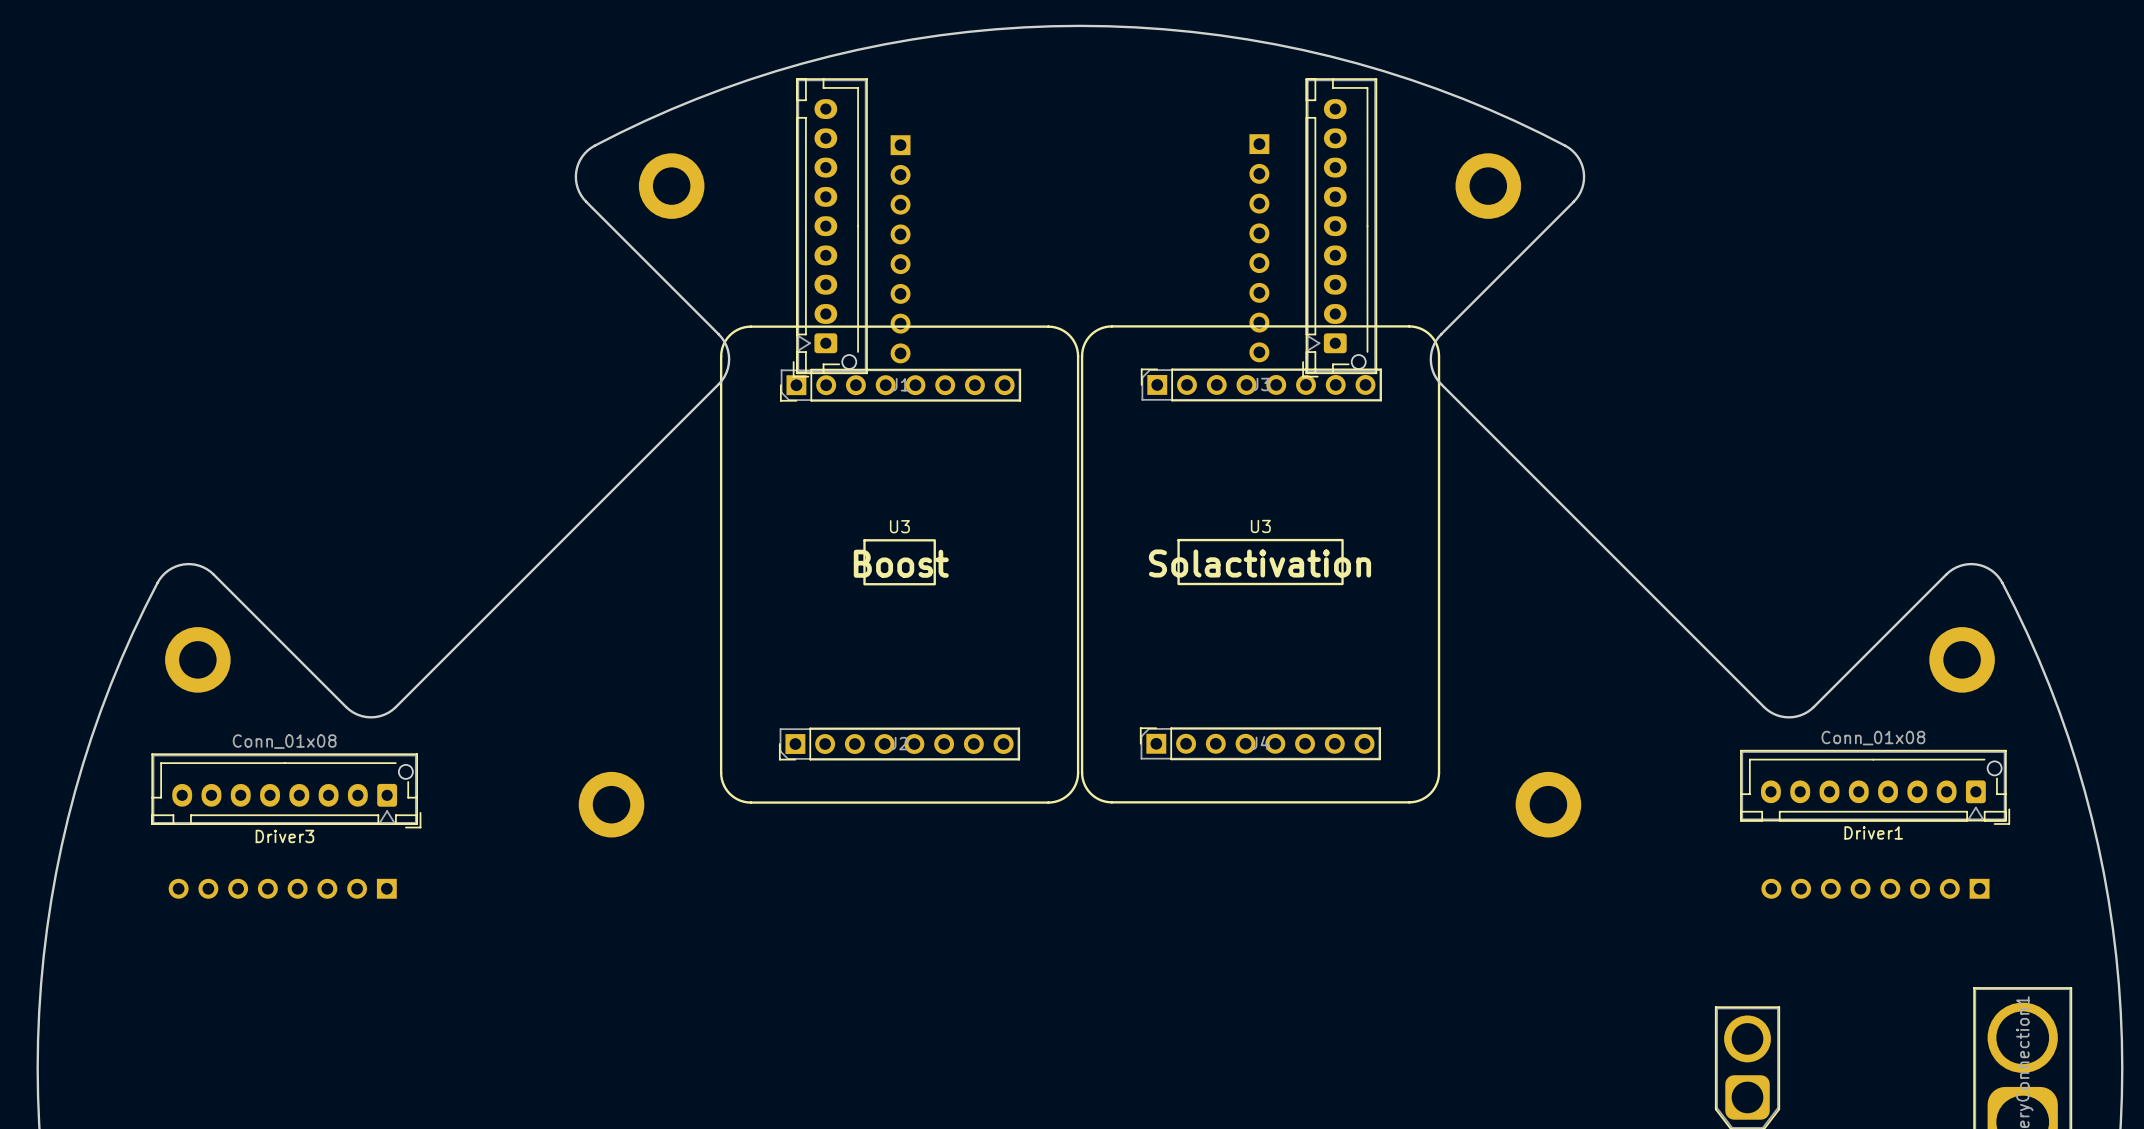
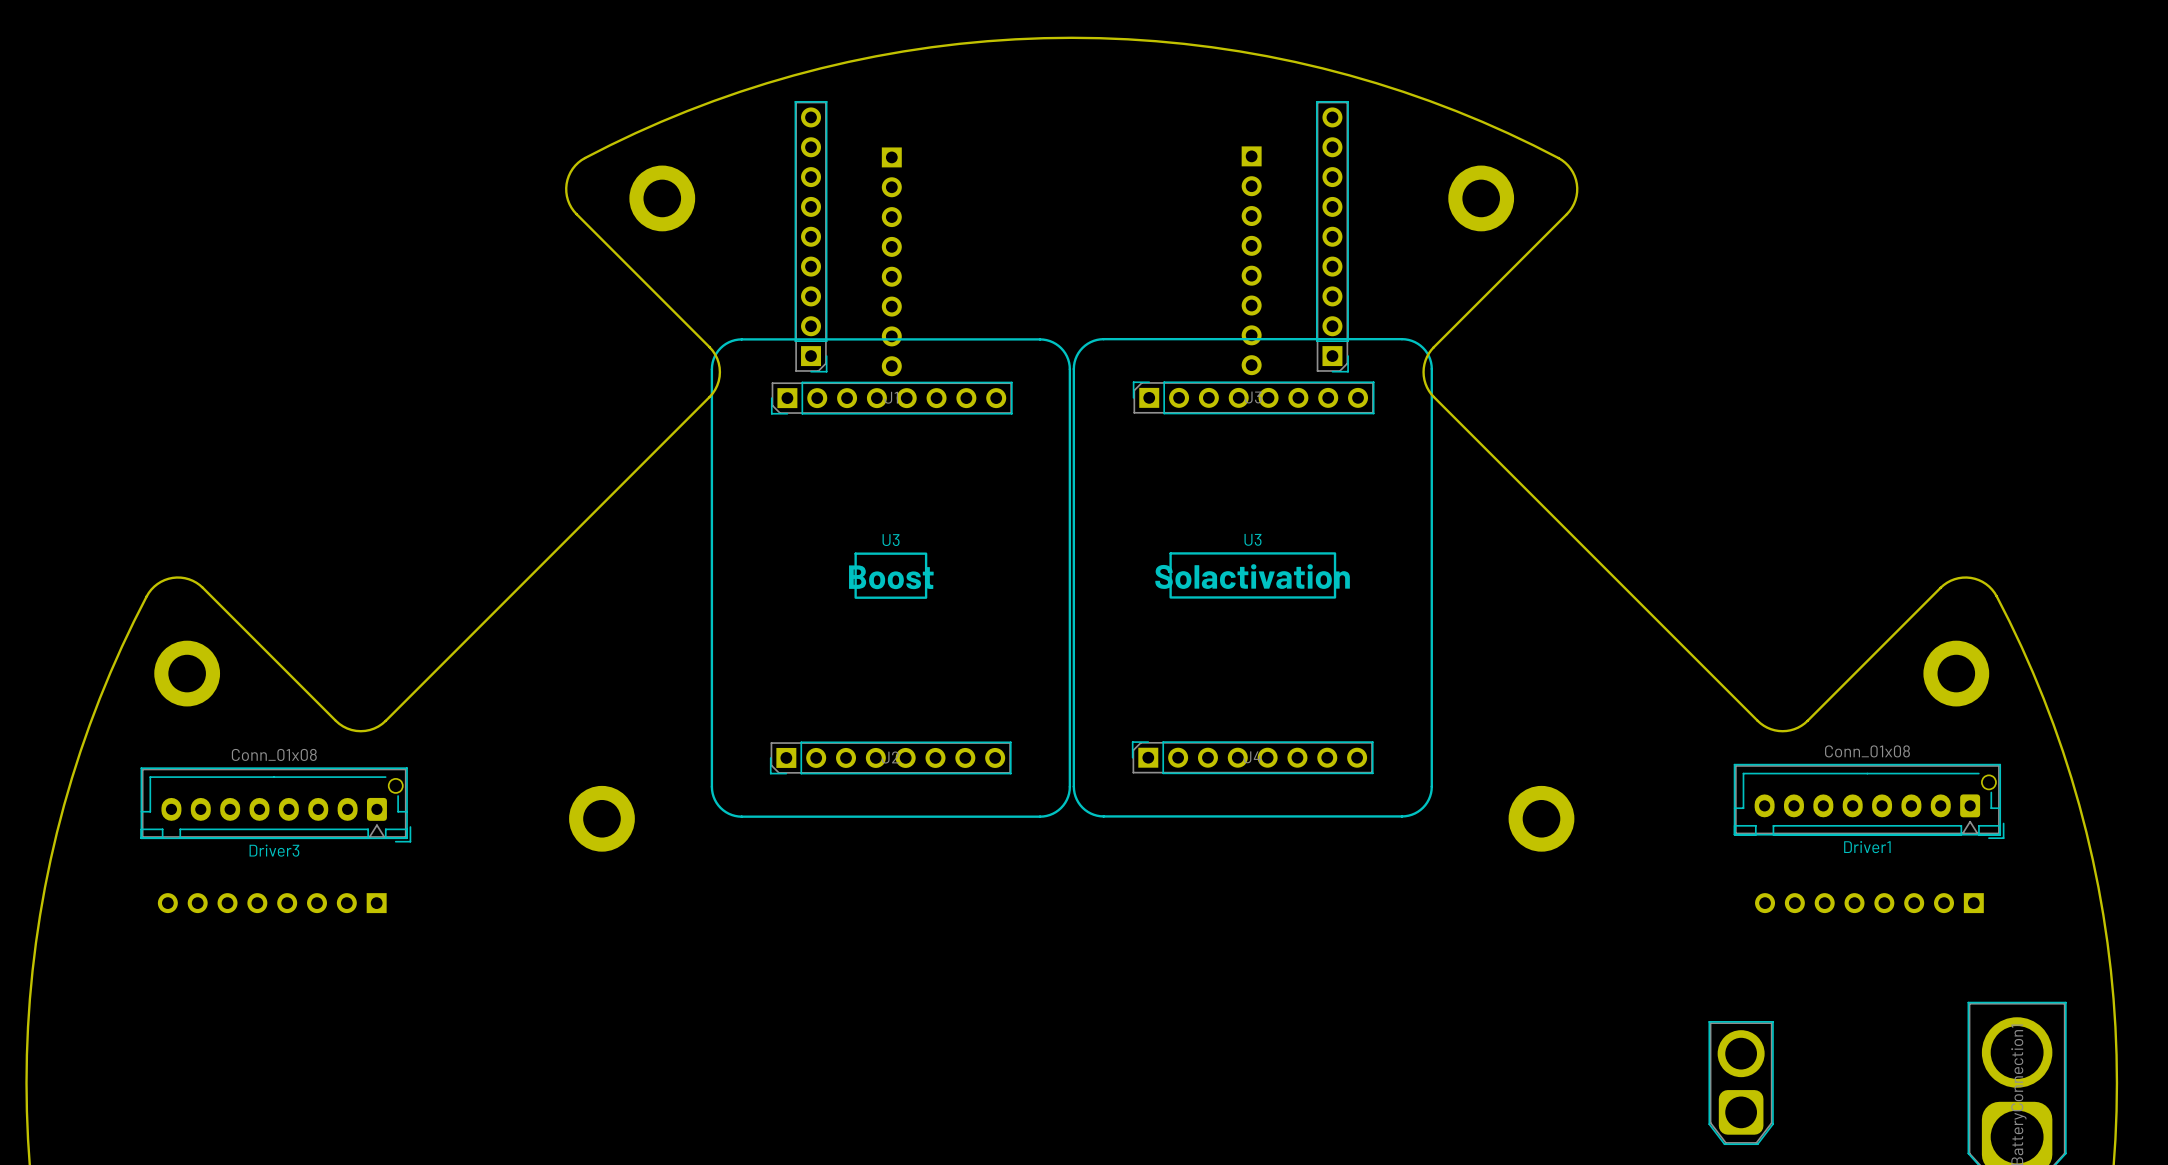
part footprint: [792, 78, 868, 378] -> [794, 101, 828, 373]
part footprint: [1302, 78, 1378, 378] -> [1316, 101, 1349, 373]

